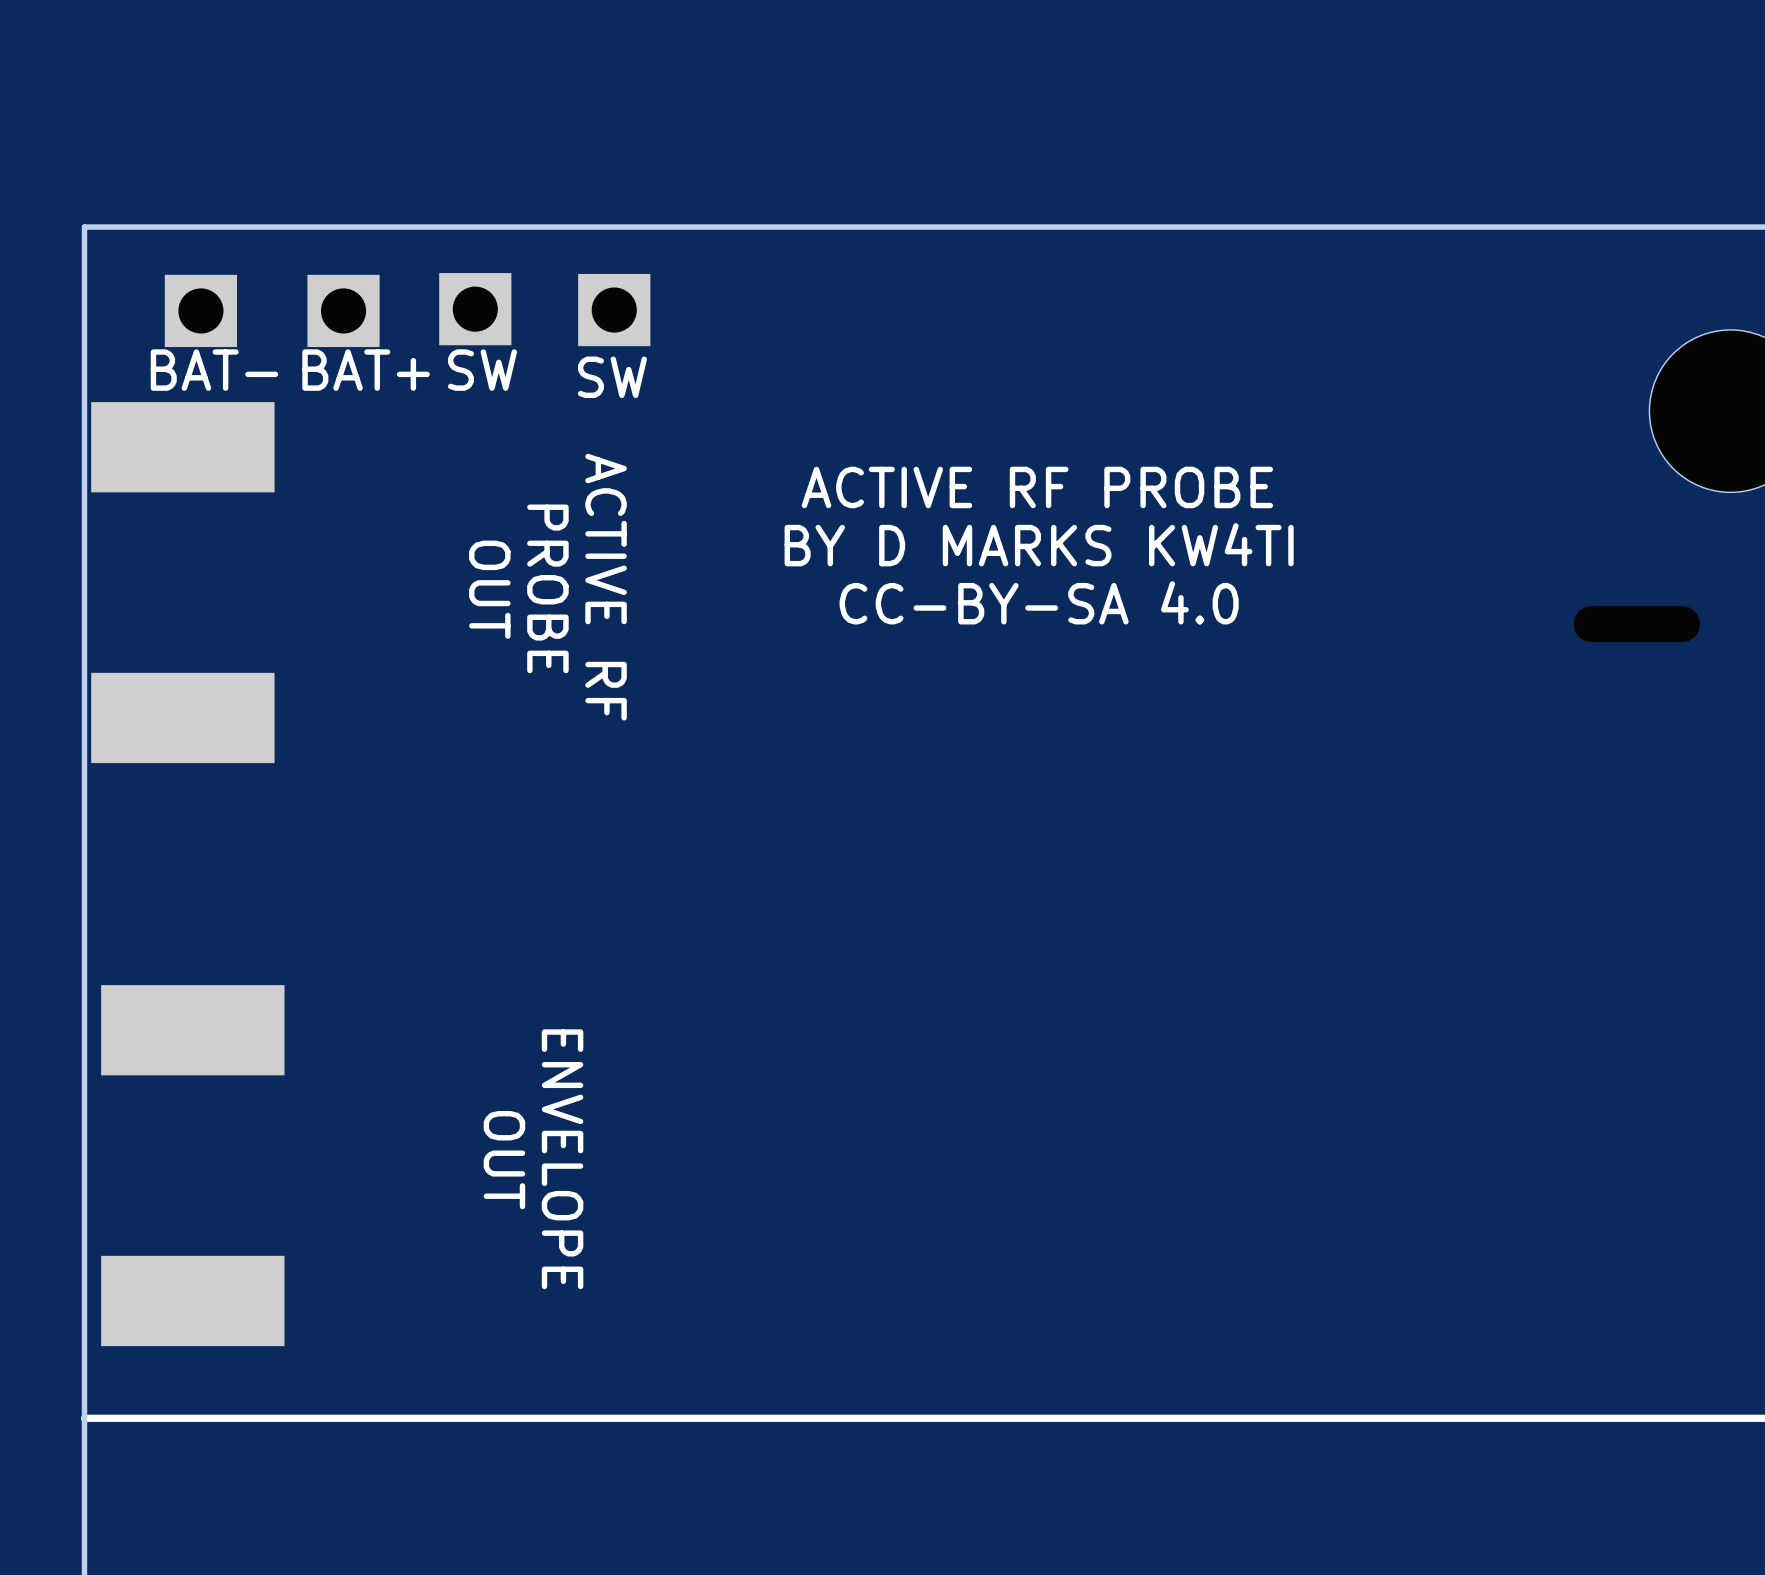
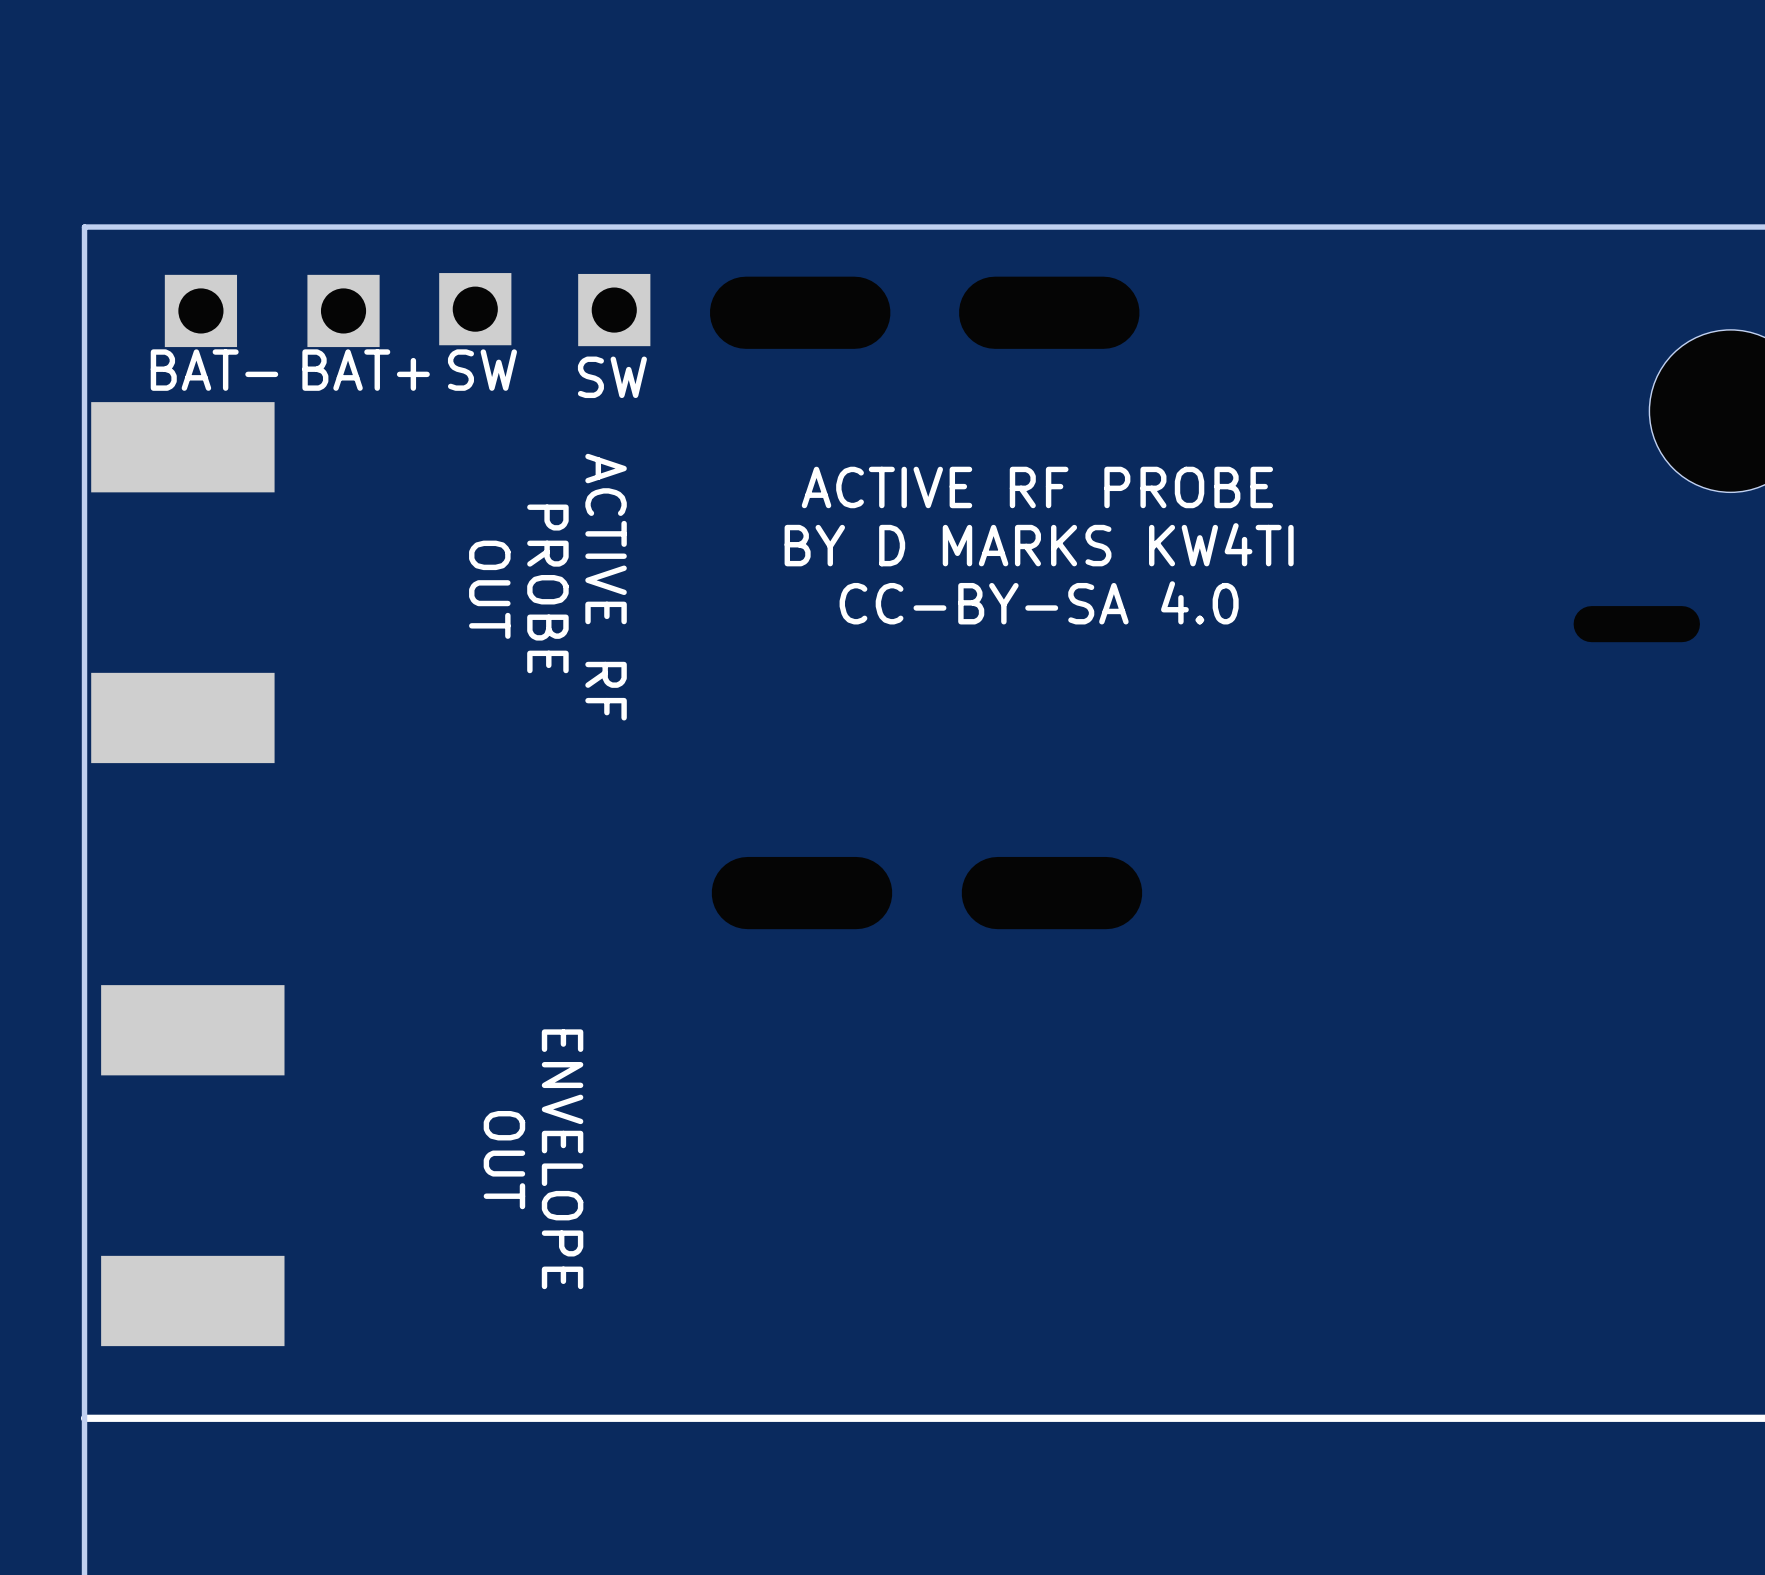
part: none -> (800, 312)
part: none -> (1049, 312)
part: none -> (801, 893)
part: none -> (1051, 893)

